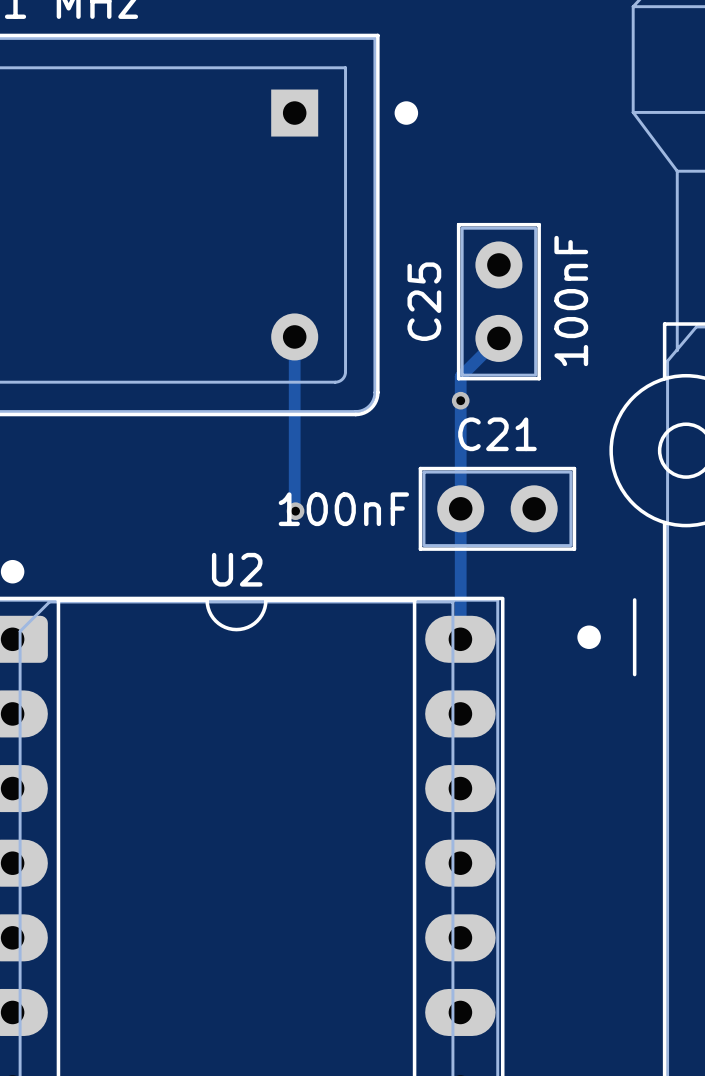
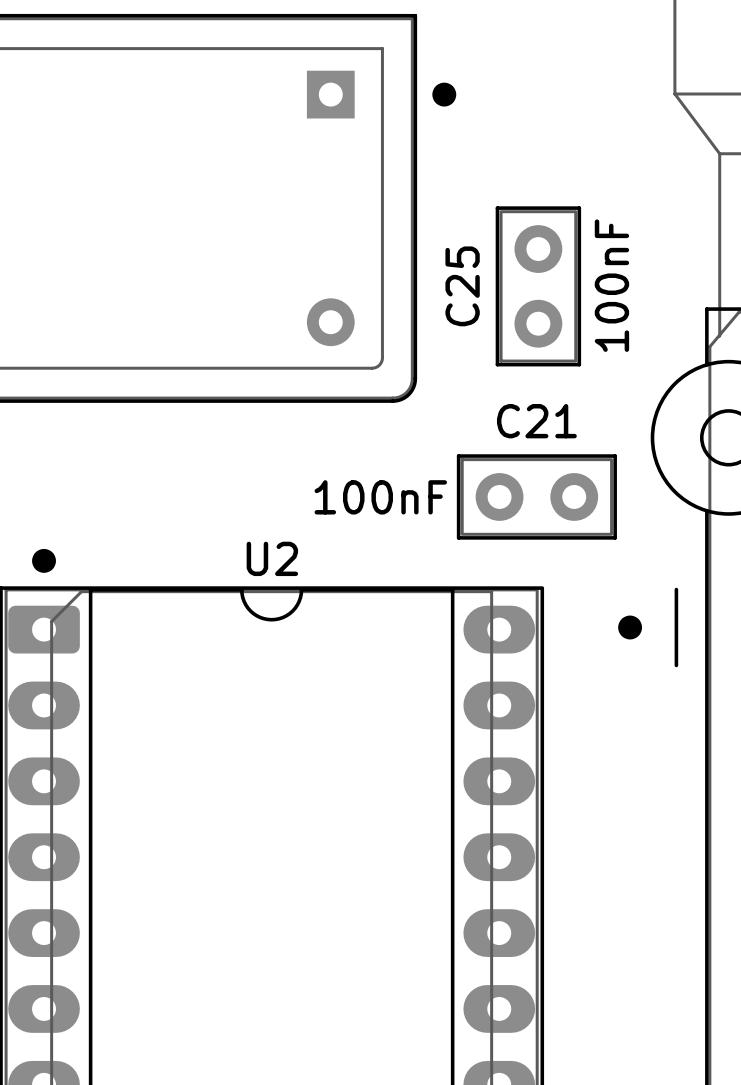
track: (294, 336) (295, 511) -> none
track: (498, 338) (460, 376) (460, 639) -> none
via: (460, 400) -> none
via: (295, 511) -> none

